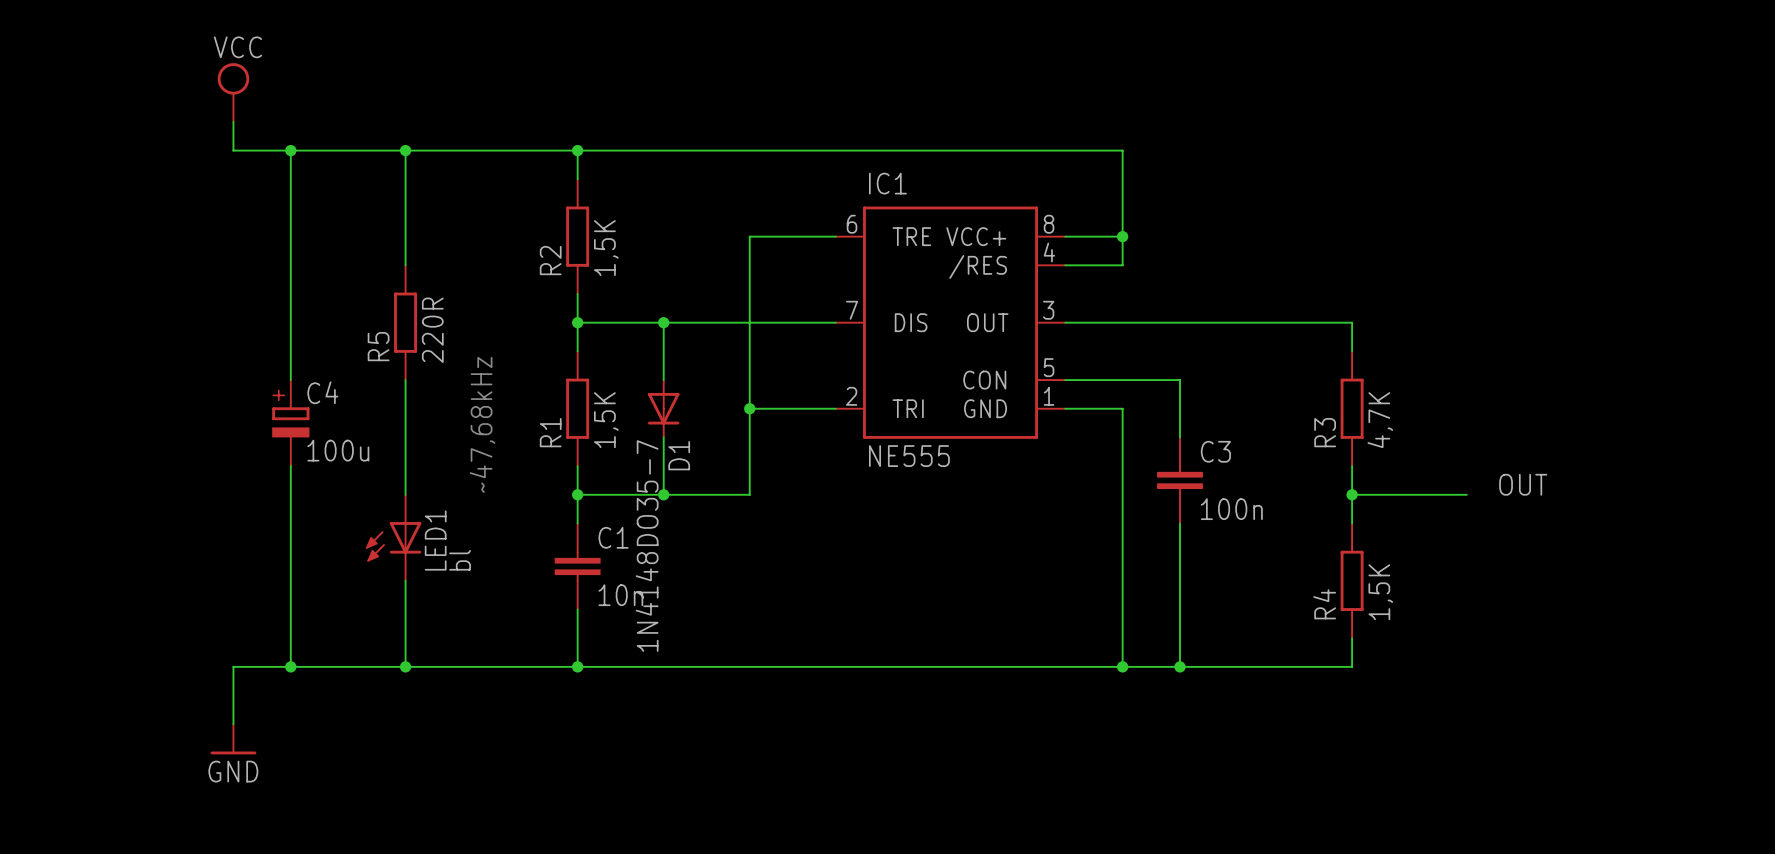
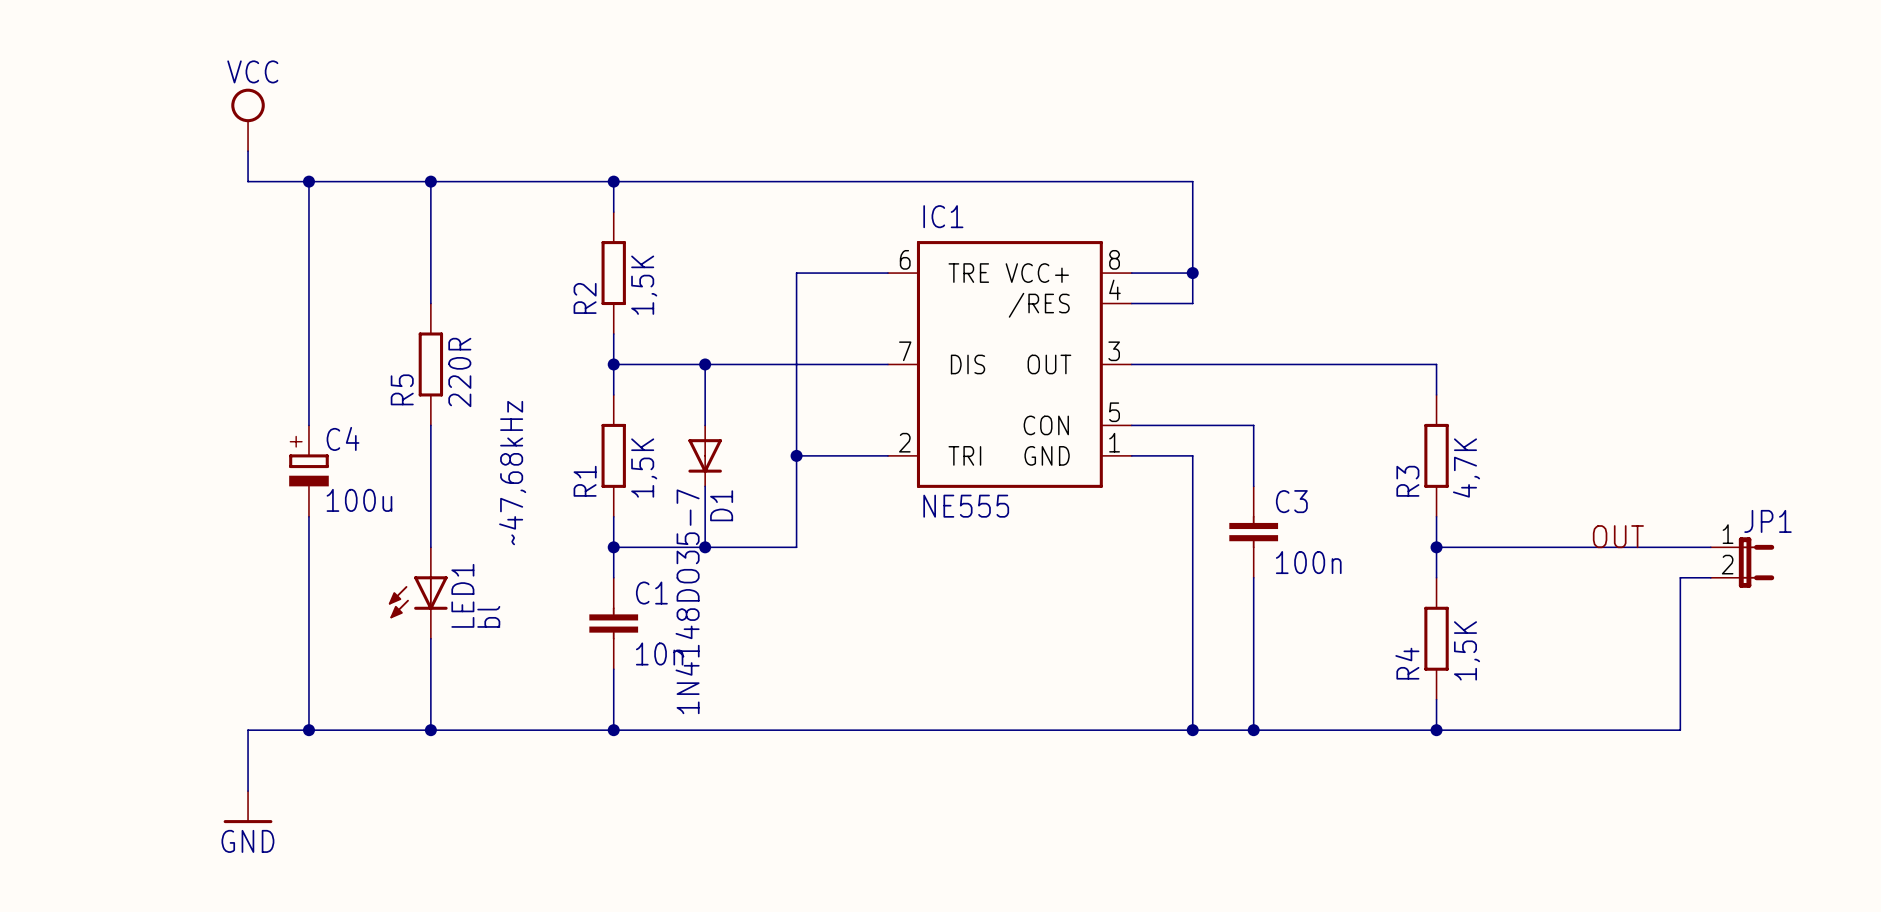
wire: none -> (1558, 547) (1710, 547)
JP1: none -> (1742, 562)
wire: none -> (1710, 577) (1680, 577) (1680, 730) (1436, 730)
junction: none -> (1436, 730)

